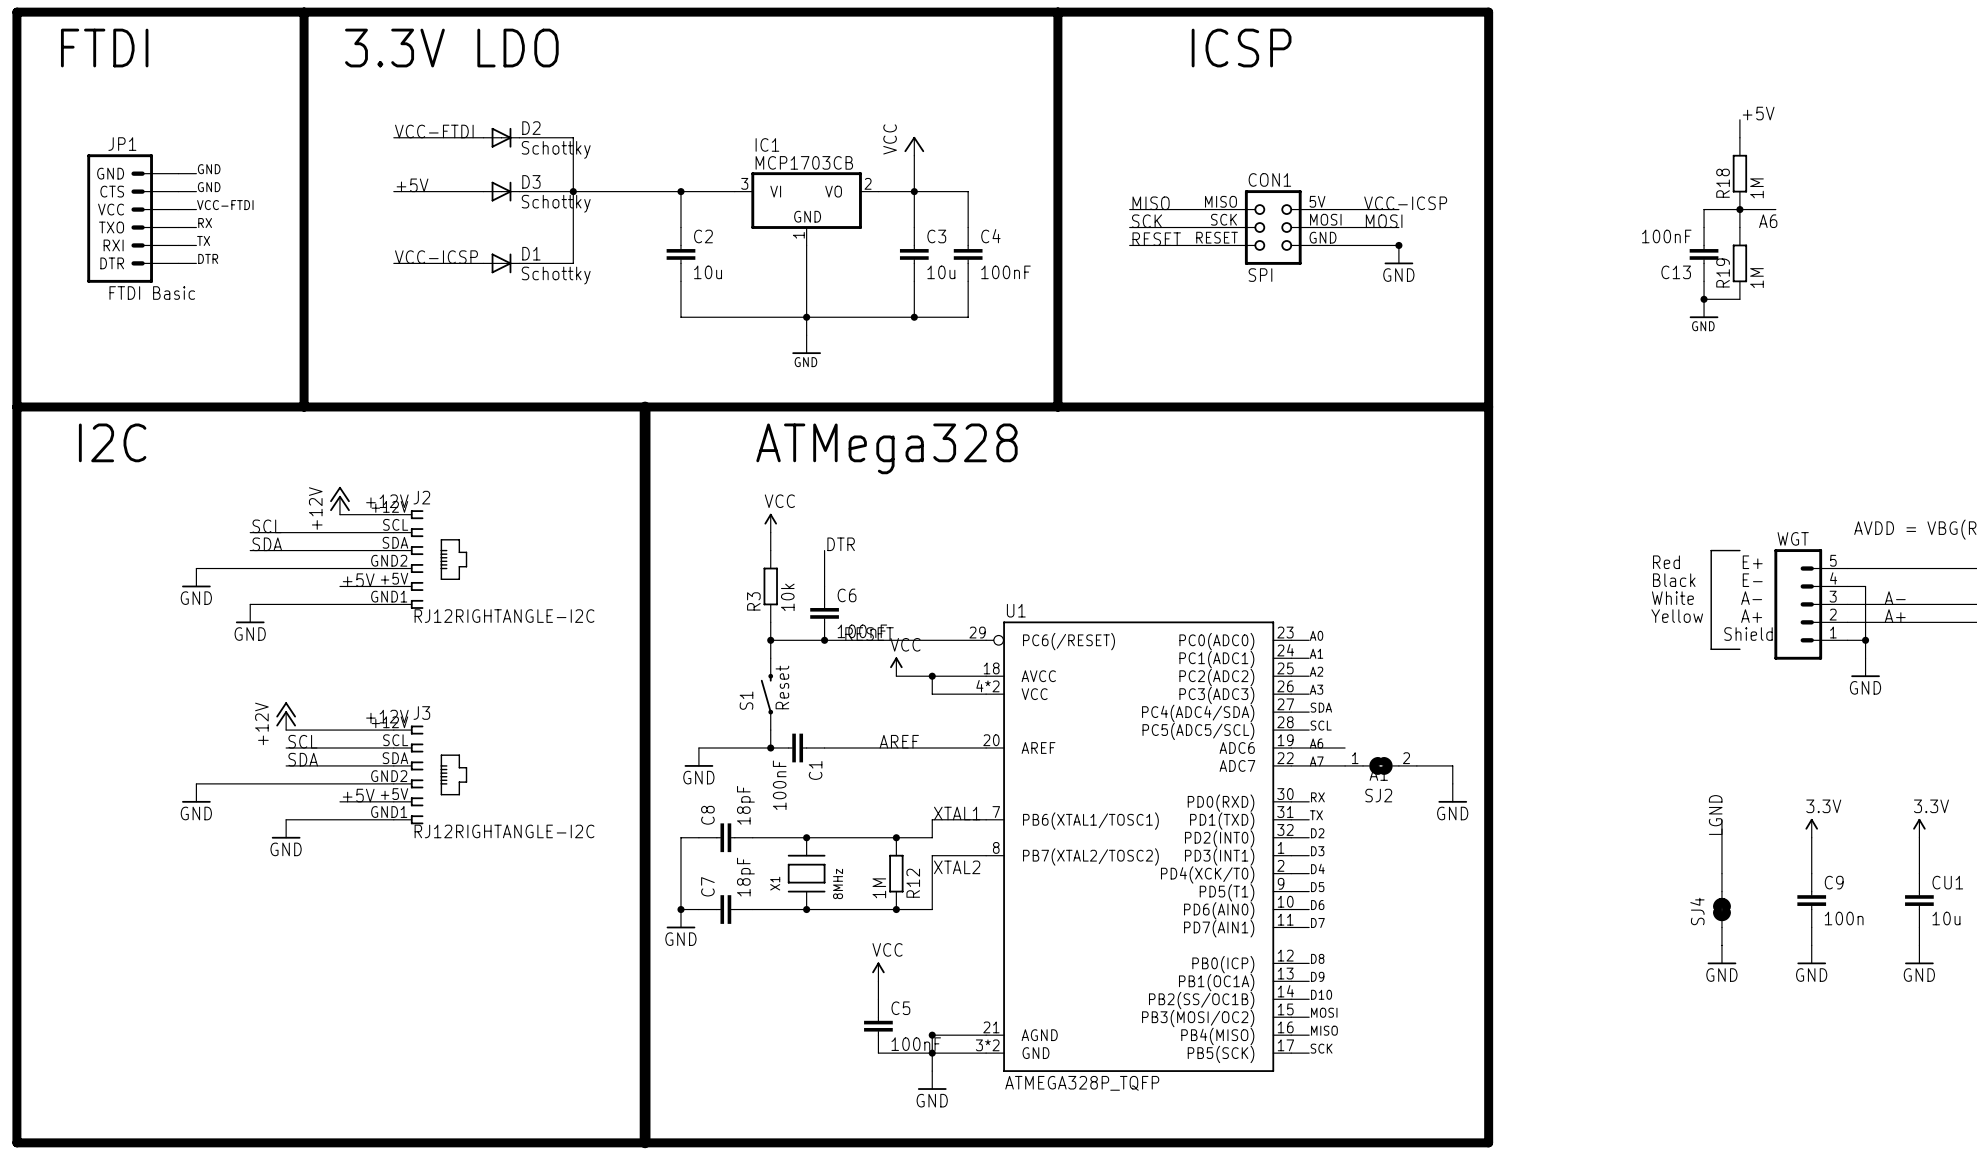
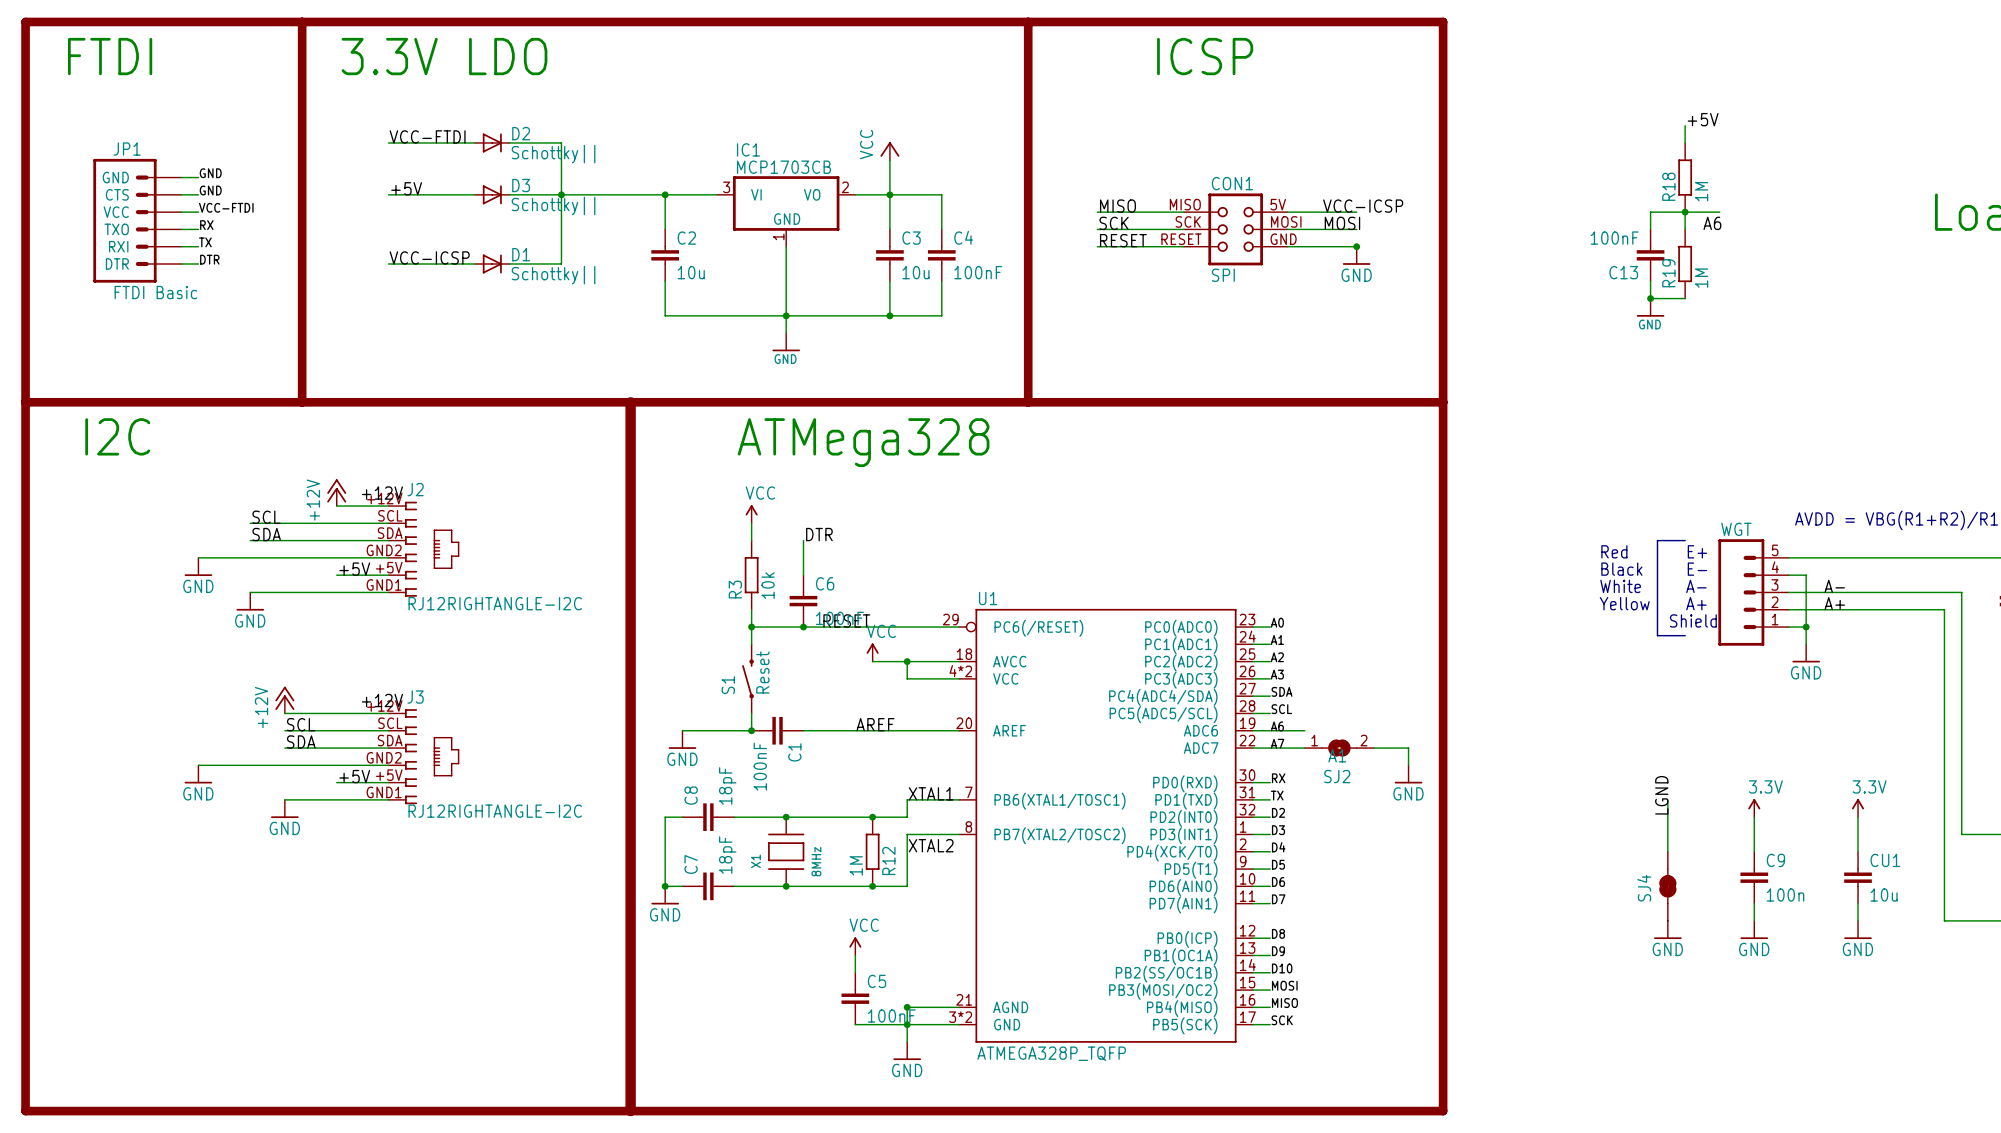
D2 value: Schottky (556, 149) -> Schottky|| (553, 154)
D3 value: Schottky (556, 203) -> Schottky|| (553, 205)
D1 value: Schottky (556, 275) -> Schottky|| (553, 275)

